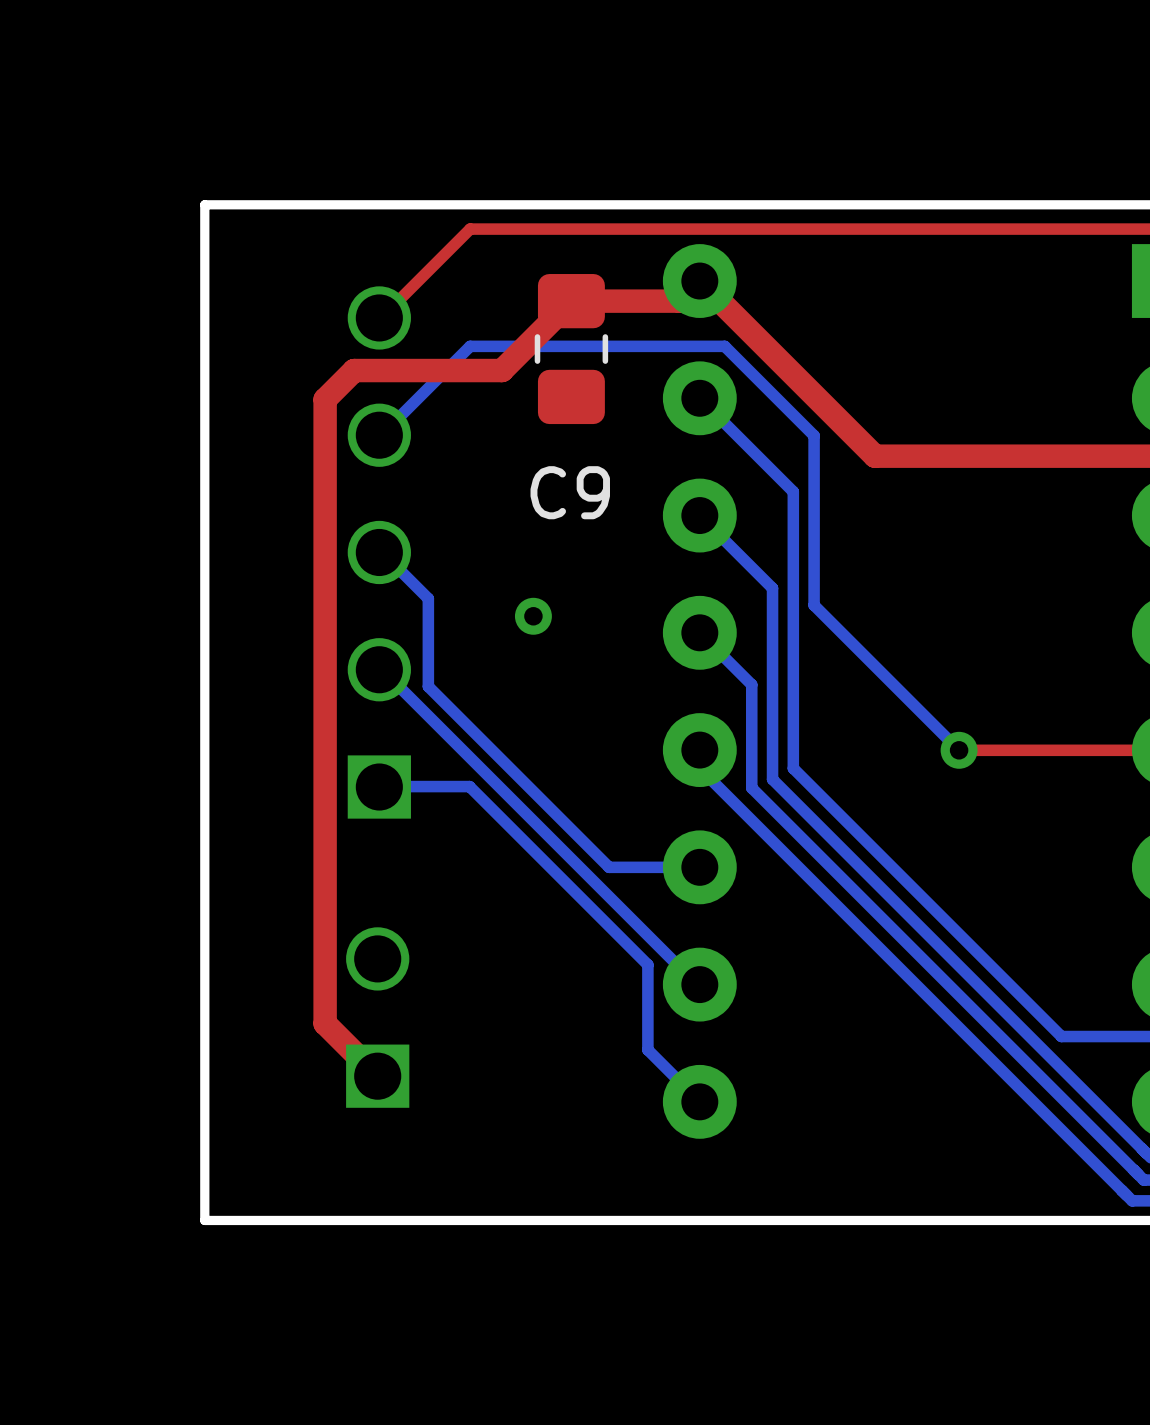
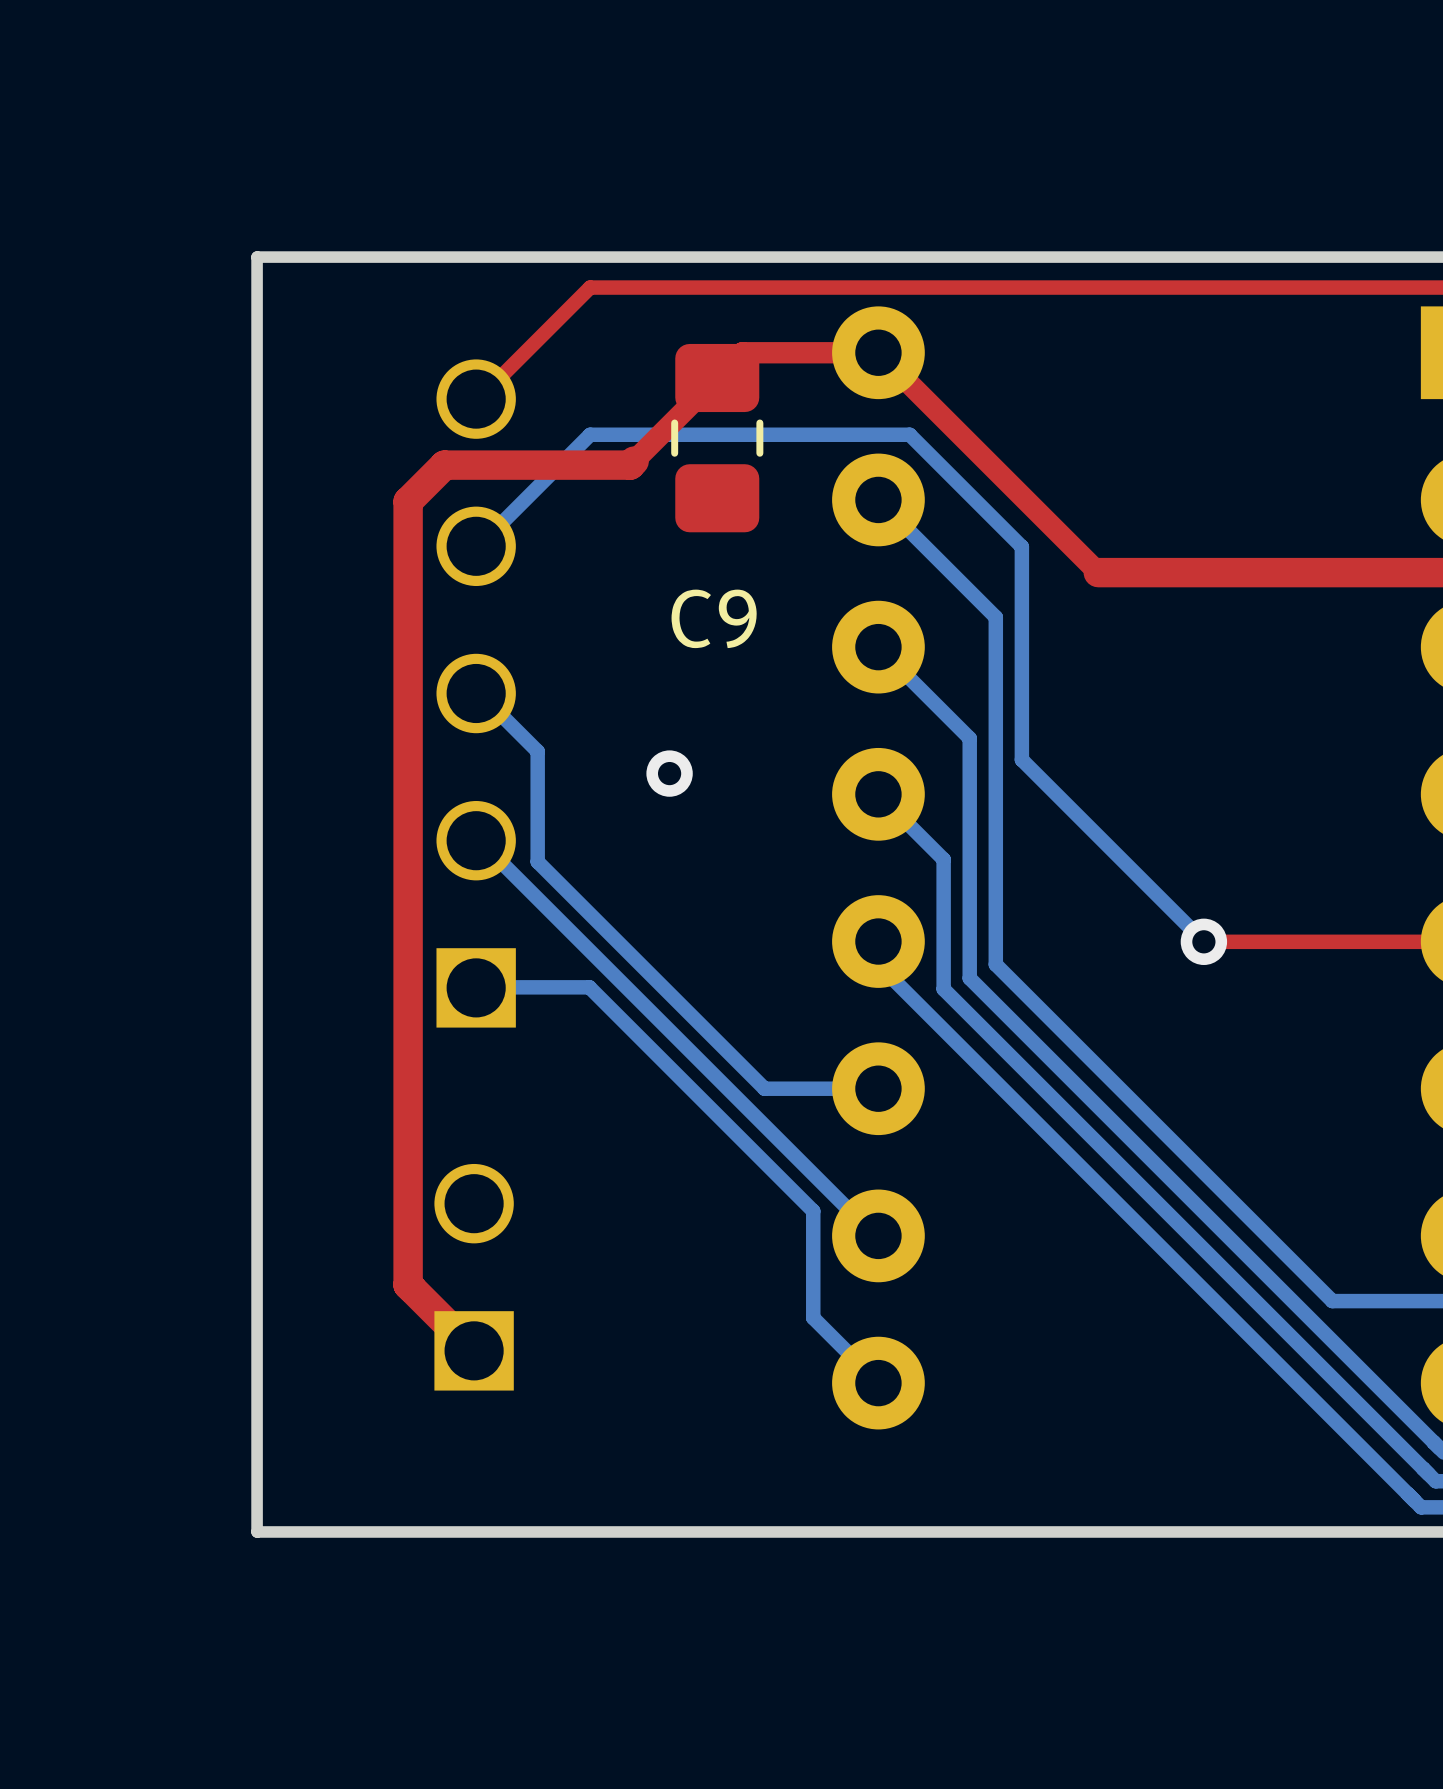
top track: (699, 281) (679, 301) (571, 301) -> (878, 352) (742, 352) (717, 378)
top track width: thick (699, 281) (874, 456) -> thin (878, 352) (1098, 572)
top track width: thick (571, 301) (505, 367) -> thin (717, 378) (634, 461)

